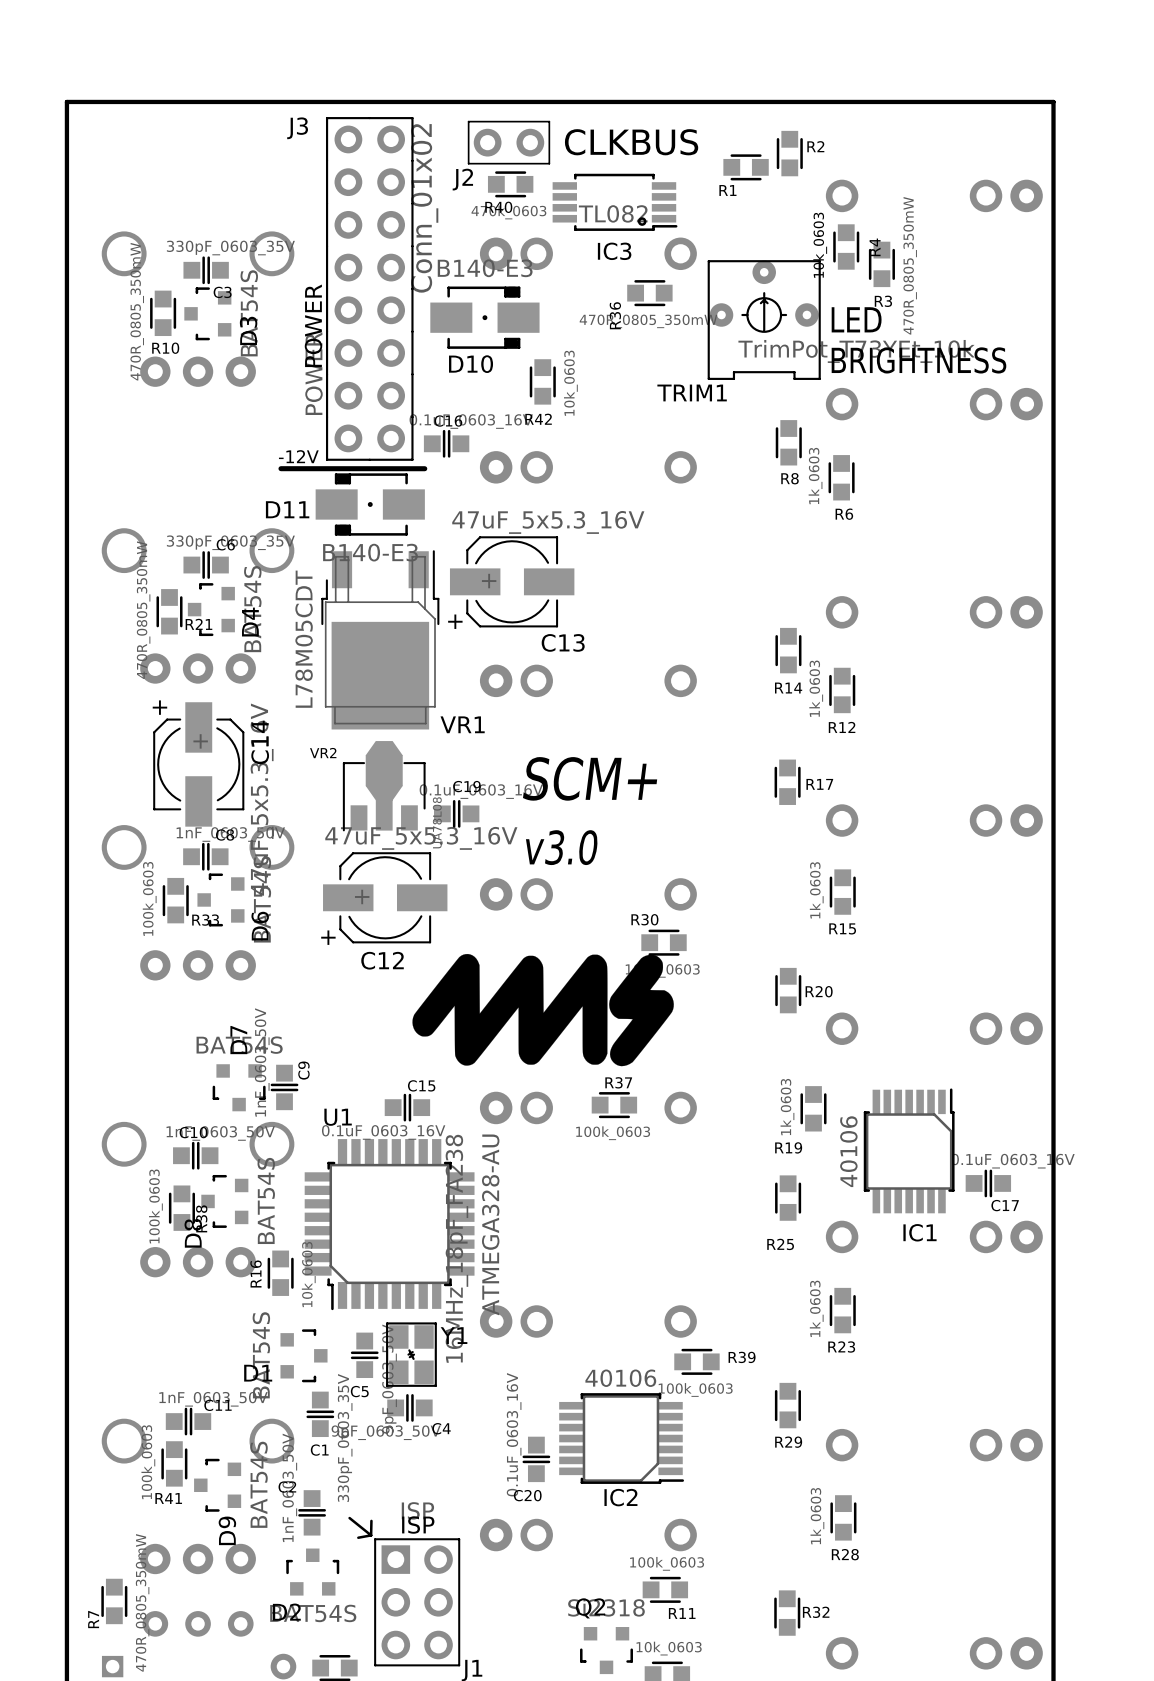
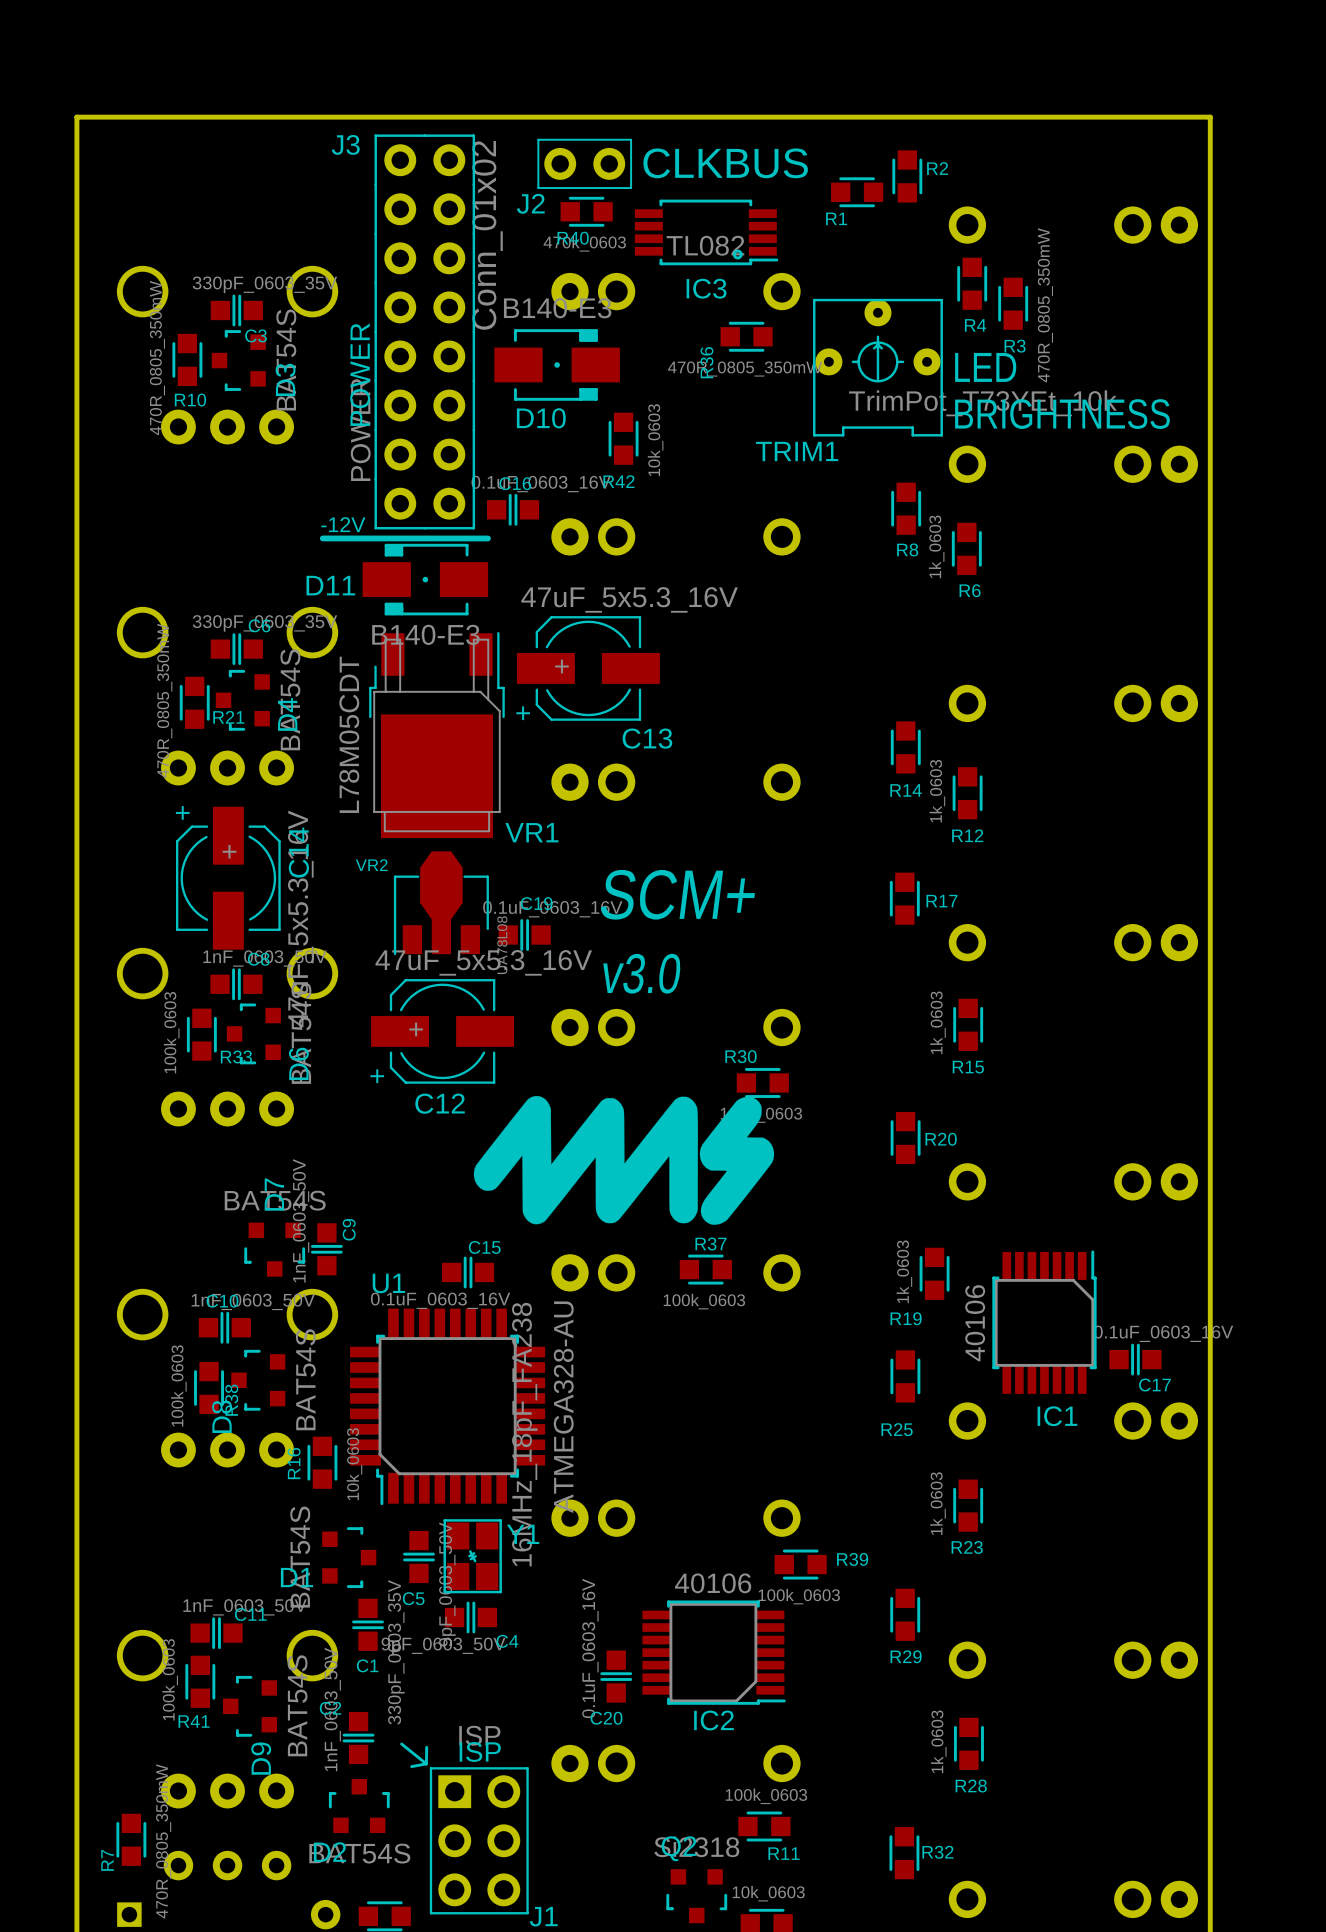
R4 value: 10k_0603 (820, 245) -> none
R4 name rotation: 0° (875, 247) -> 90° clockwise (975, 325)
R4 name position: R4 (875, 247) -> R4 (975, 325)

